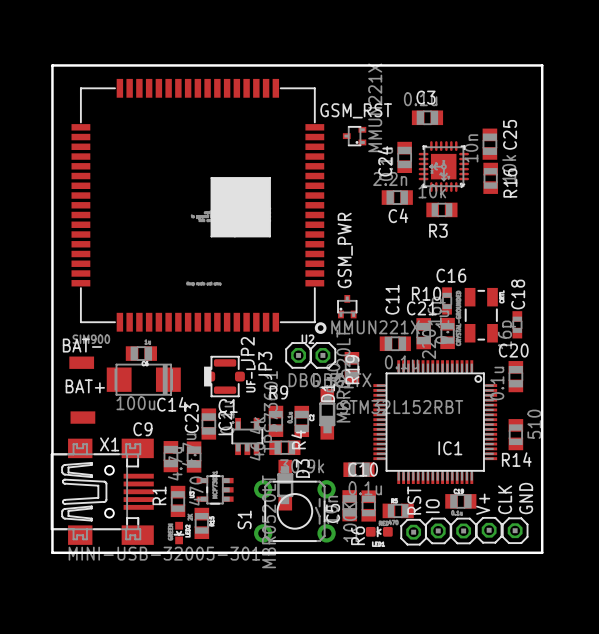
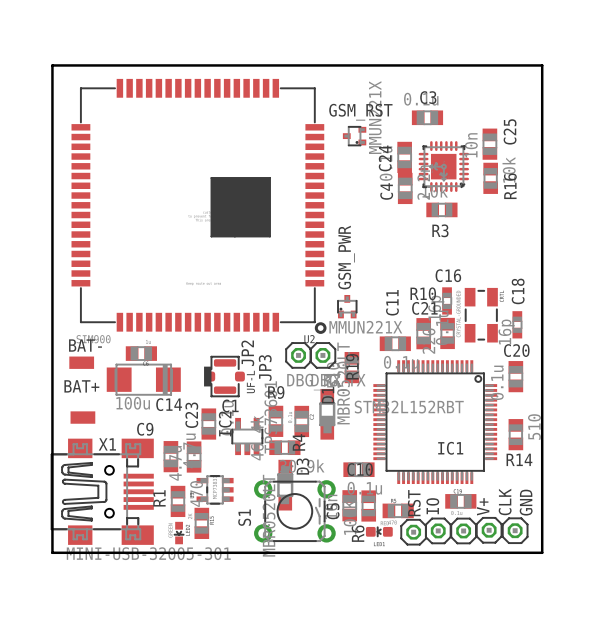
C4 rotation: 0° (397, 197) -> 90° clockwise (405, 188)

